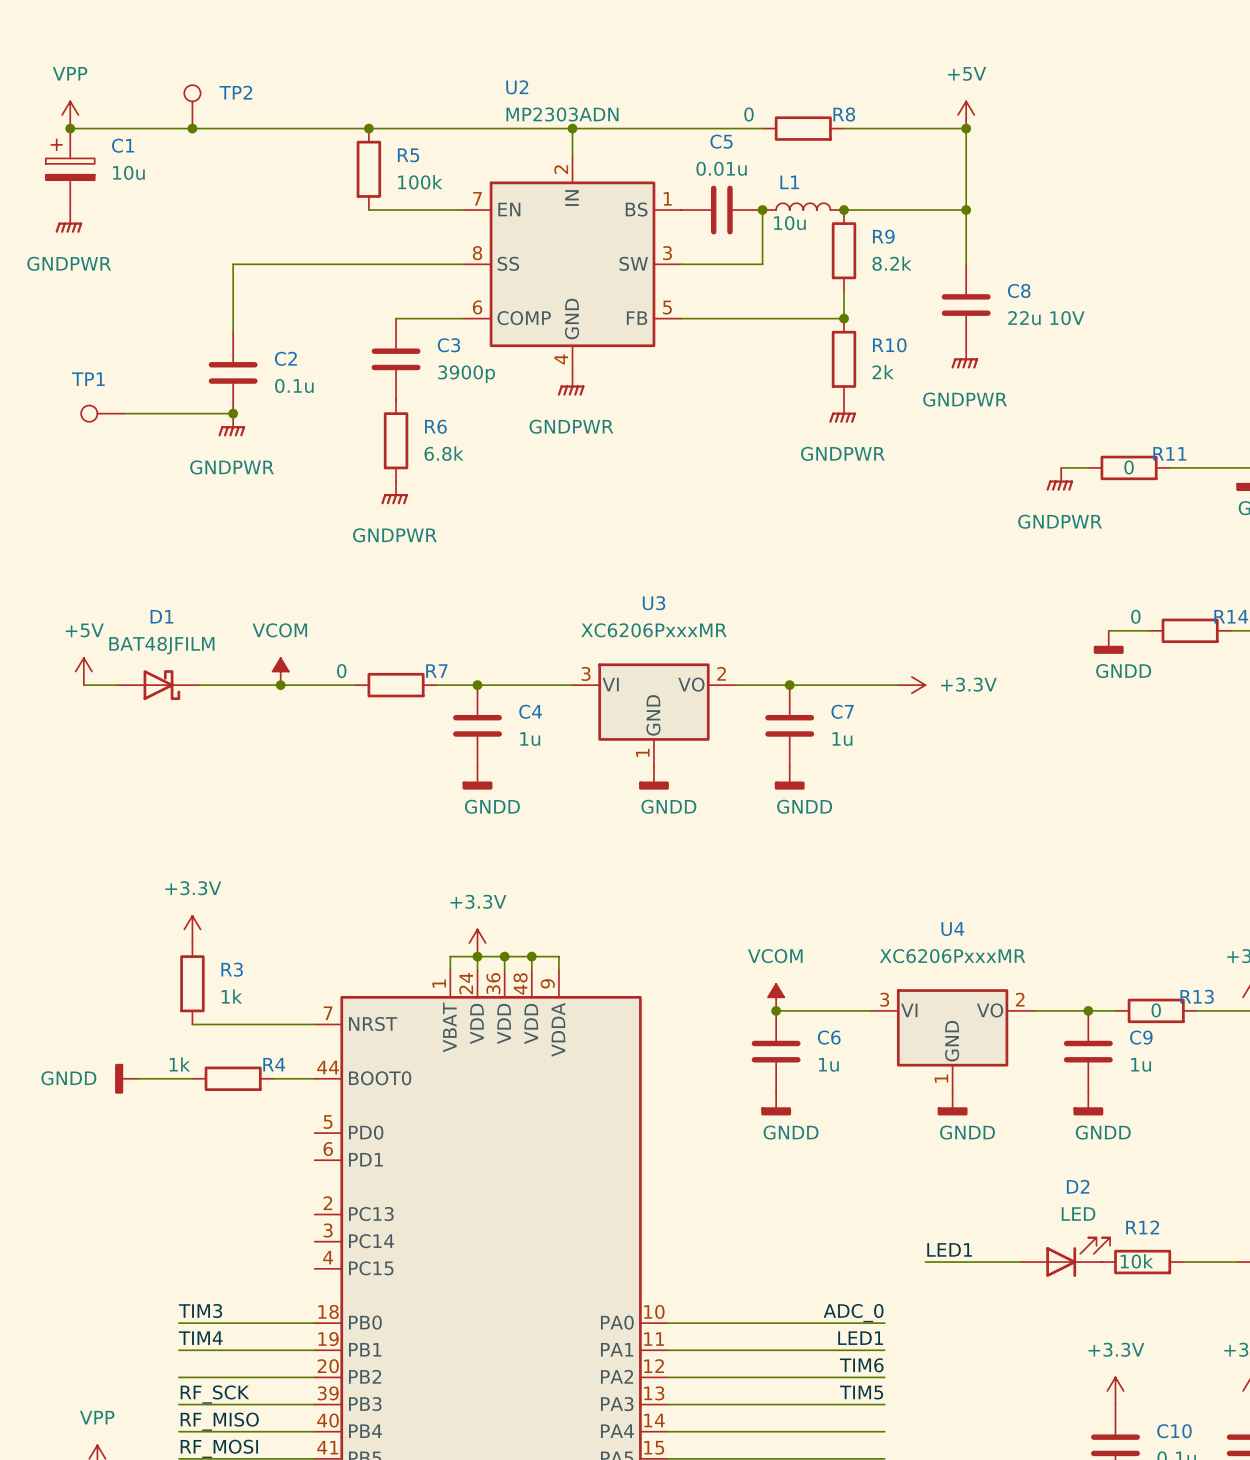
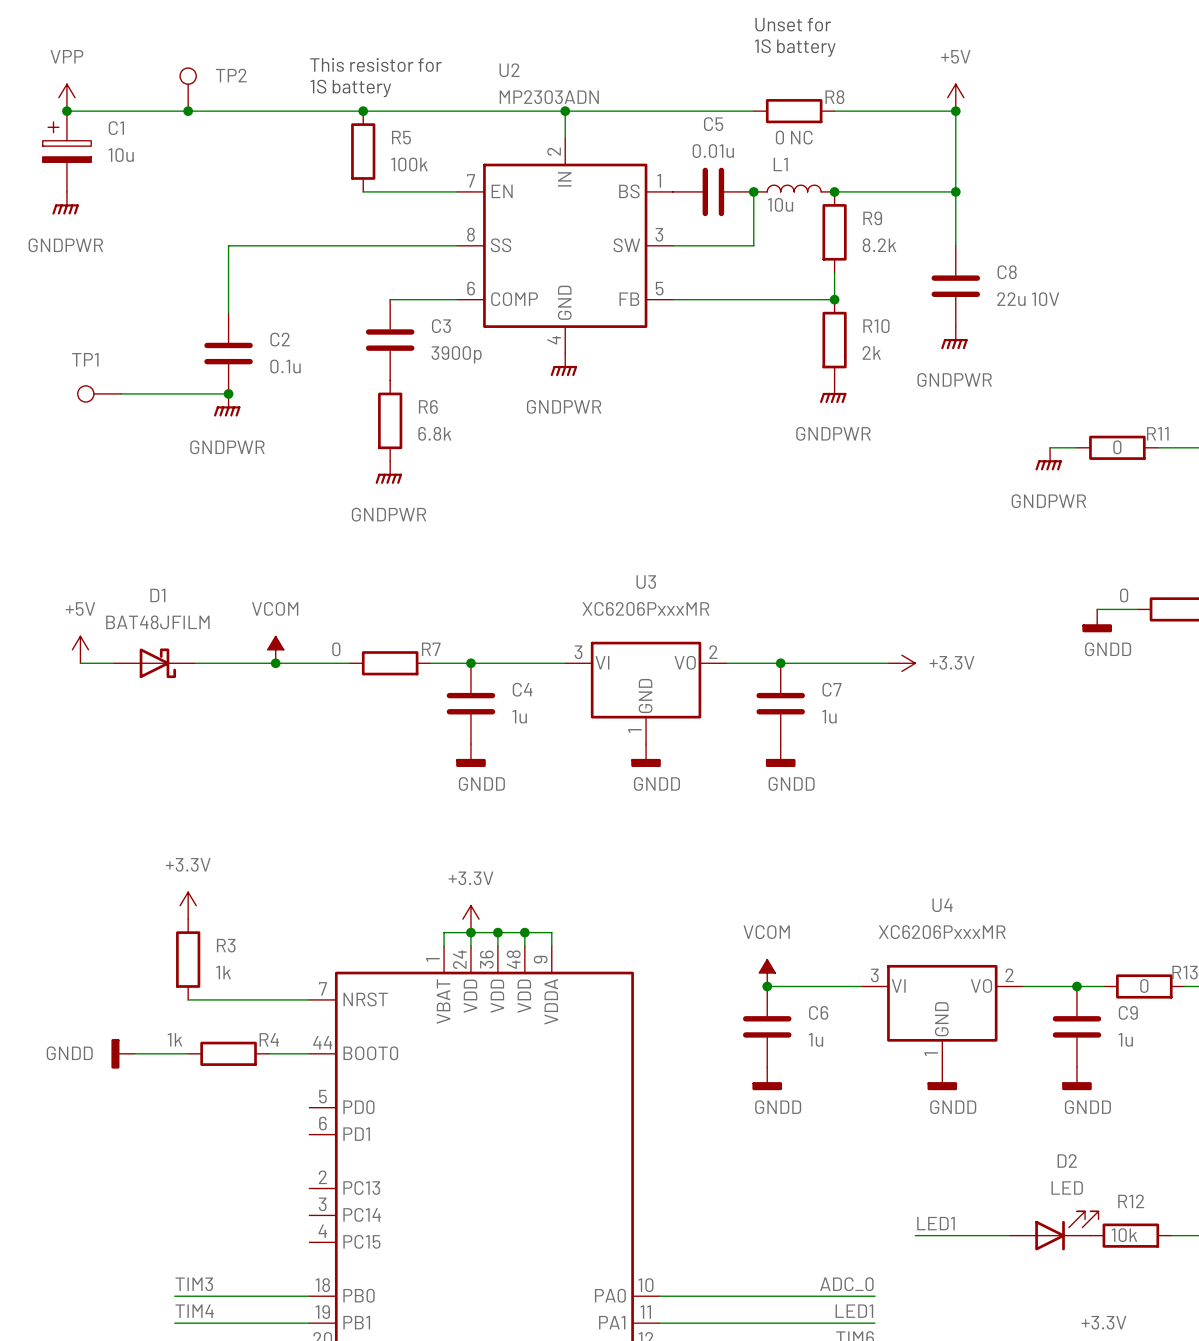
text: none -> Unset for (793, 24)
text: none -> 1S battery (795, 48)
text: none -> This resistor for (375, 64)
text: none -> 1S battery (350, 88)
R8 value: 0 (748, 114) -> 0 NC (794, 137)

